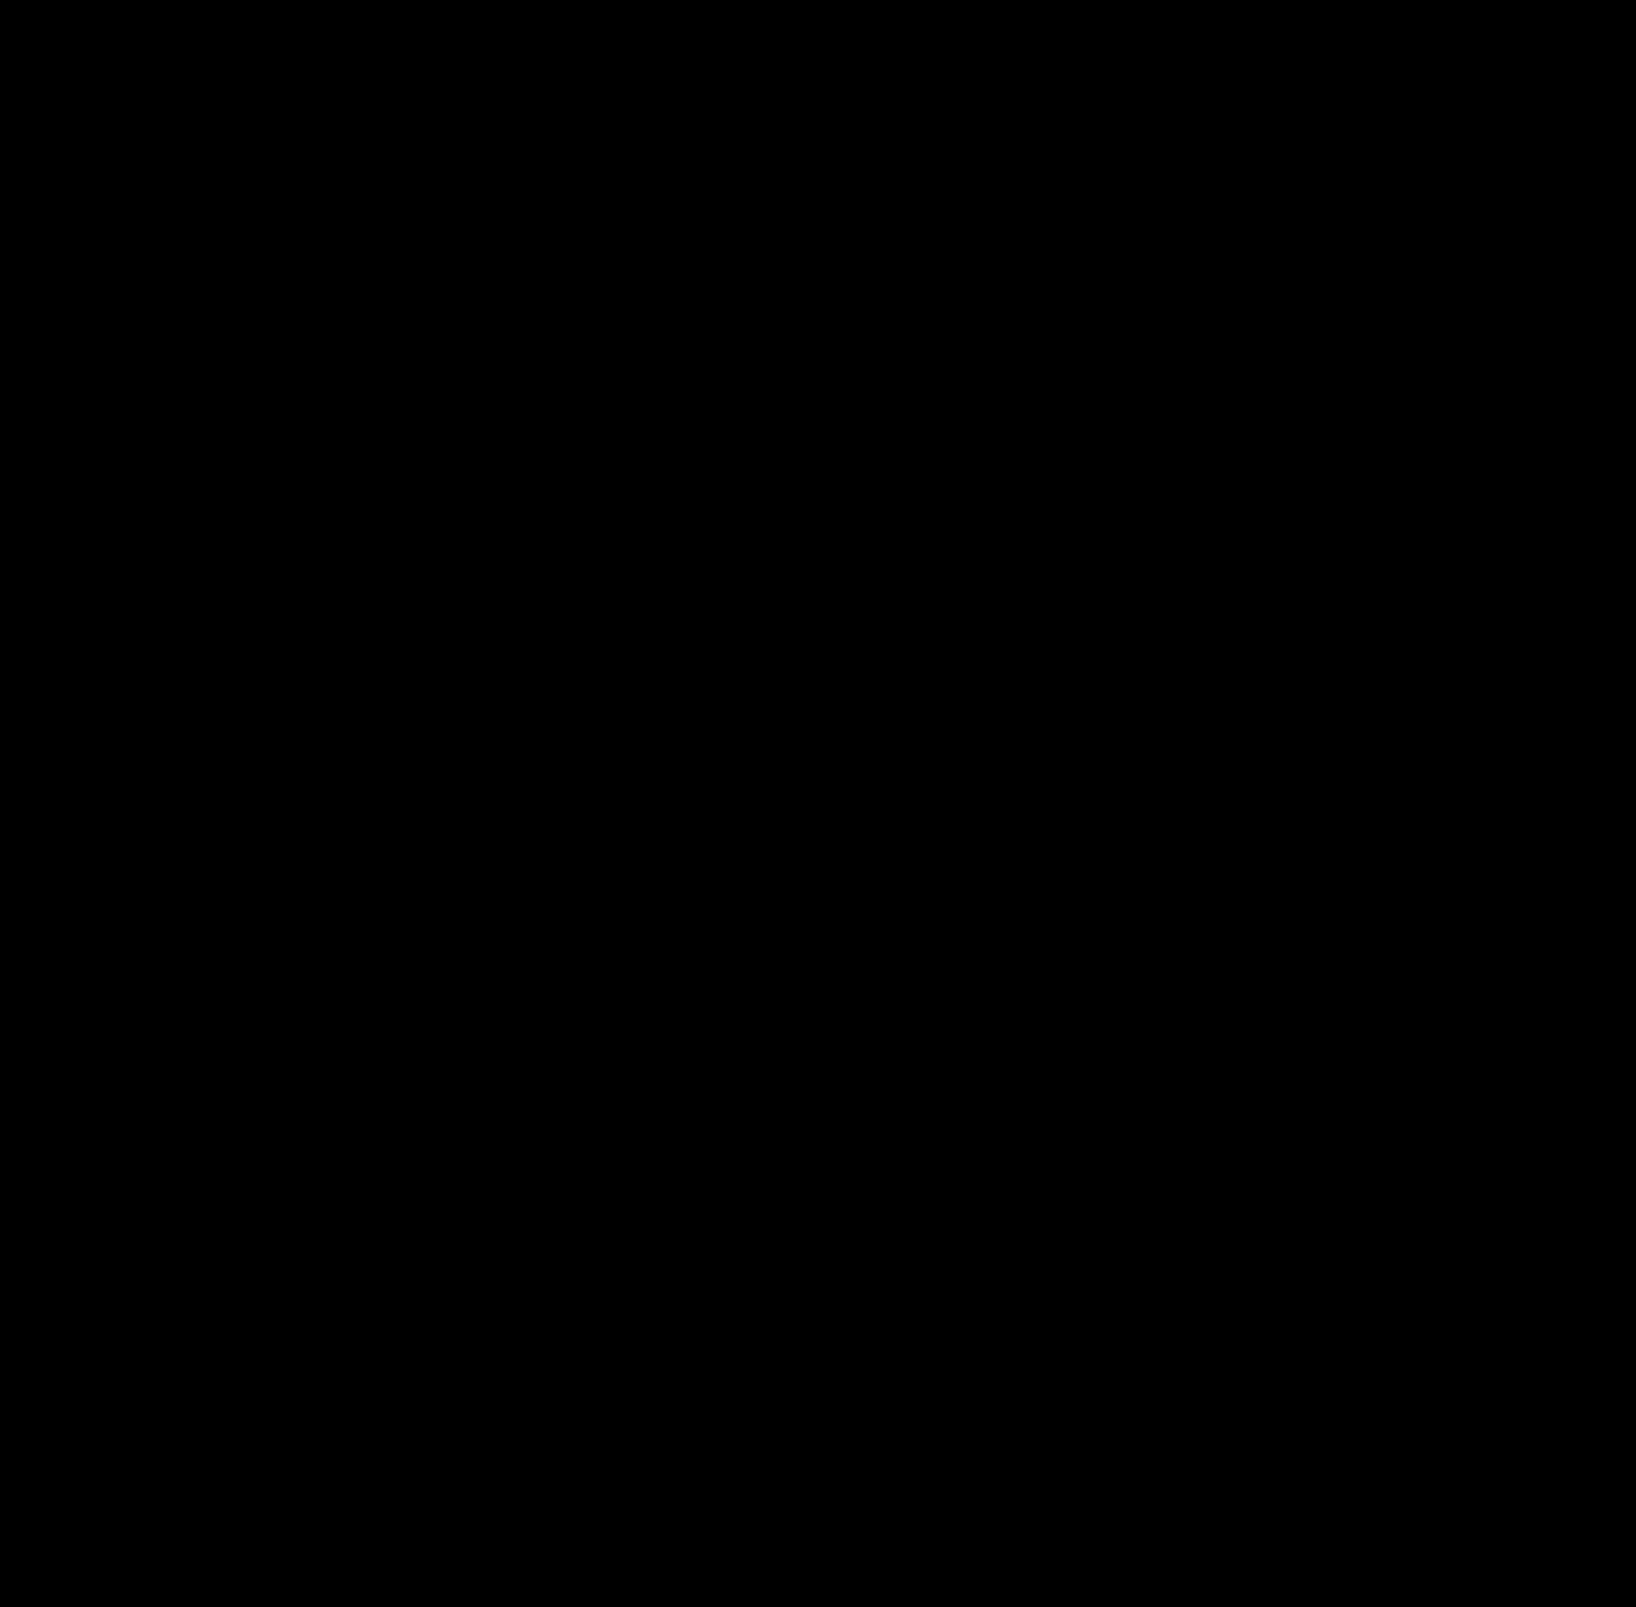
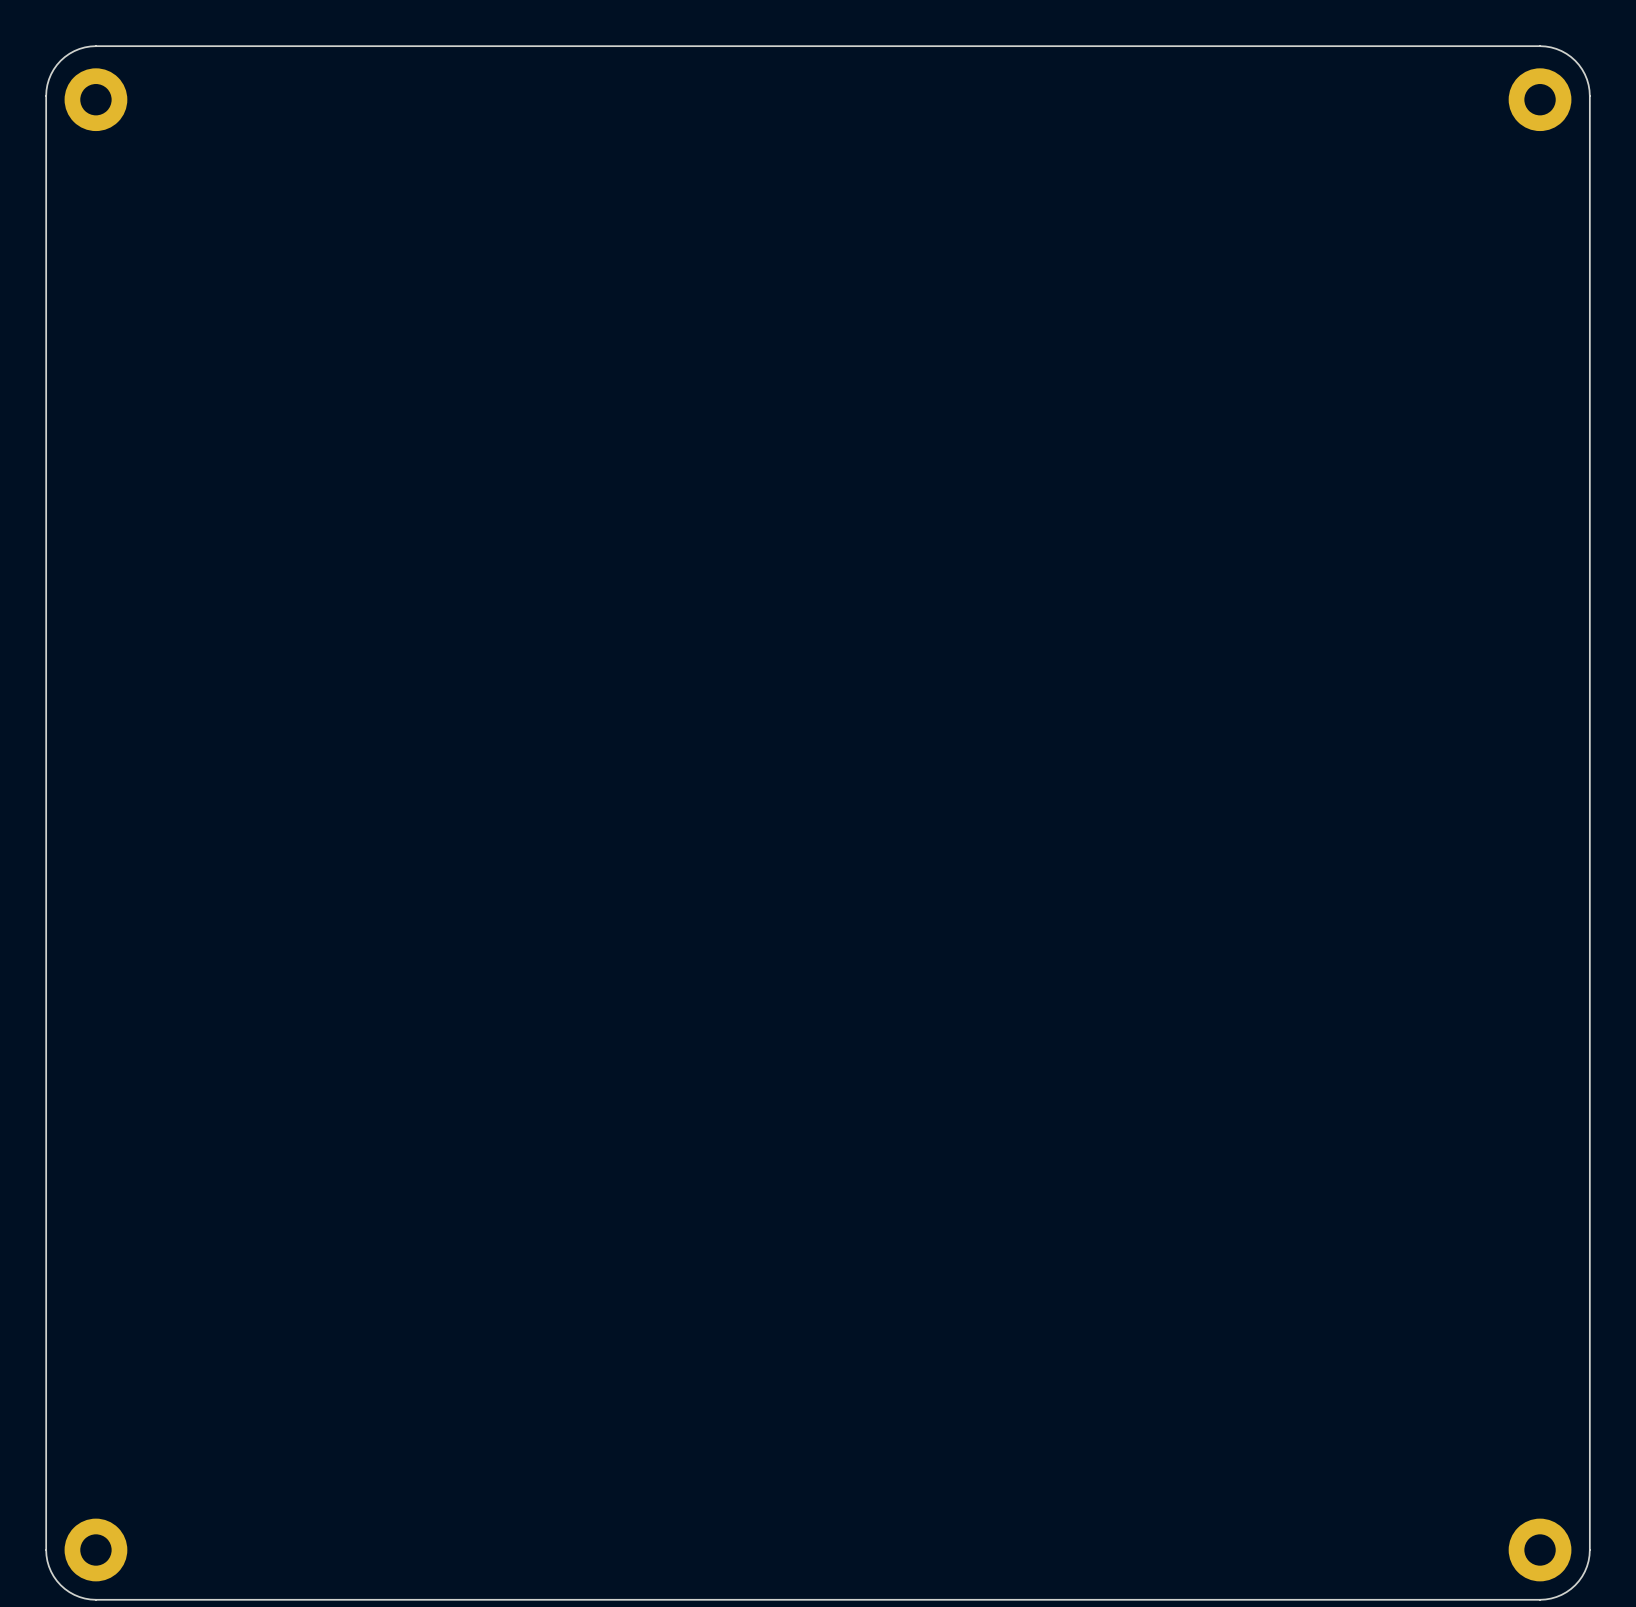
part: none -> (95, 99)
part: none -> (1540, 99)
part: none -> (95, 1550)
part: none -> (1540, 1550)
board edge: none -> (1540, 1599) (1556, 1597) (1575, 1585) (1584, 1571) (1589, 1550) (1589, 95) (1587, 79) (1575, 60) (1556, 48) (1540, 46) (95, 46) (74, 51) (60, 60) (51, 74) (46, 95) (46, 1550) (48, 1566) (60, 1585) (74, 1594) (95, 1599) (1540, 1599)

